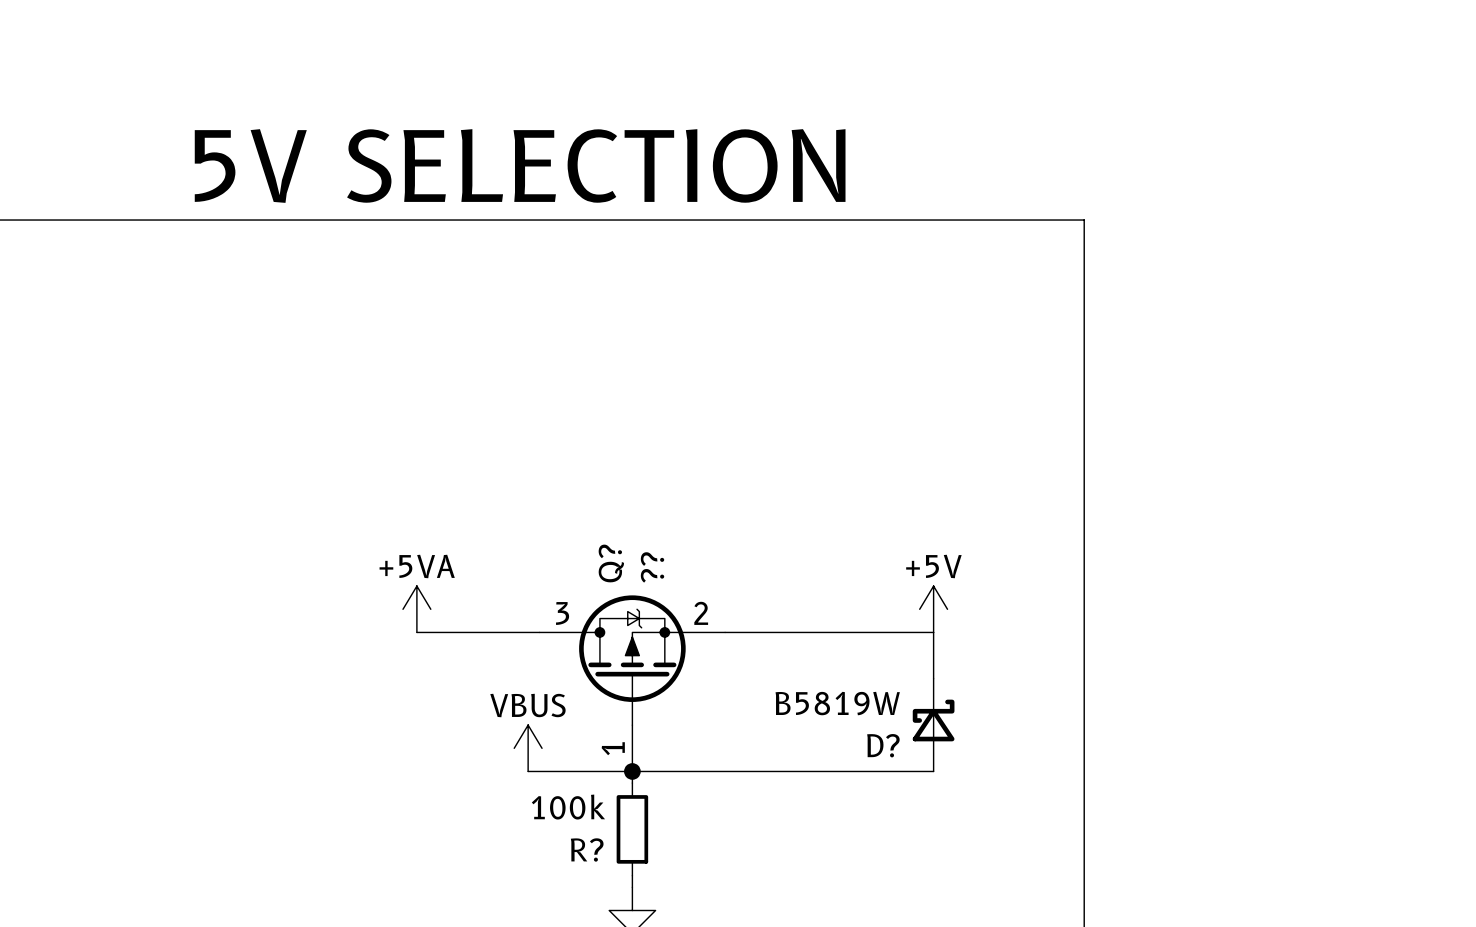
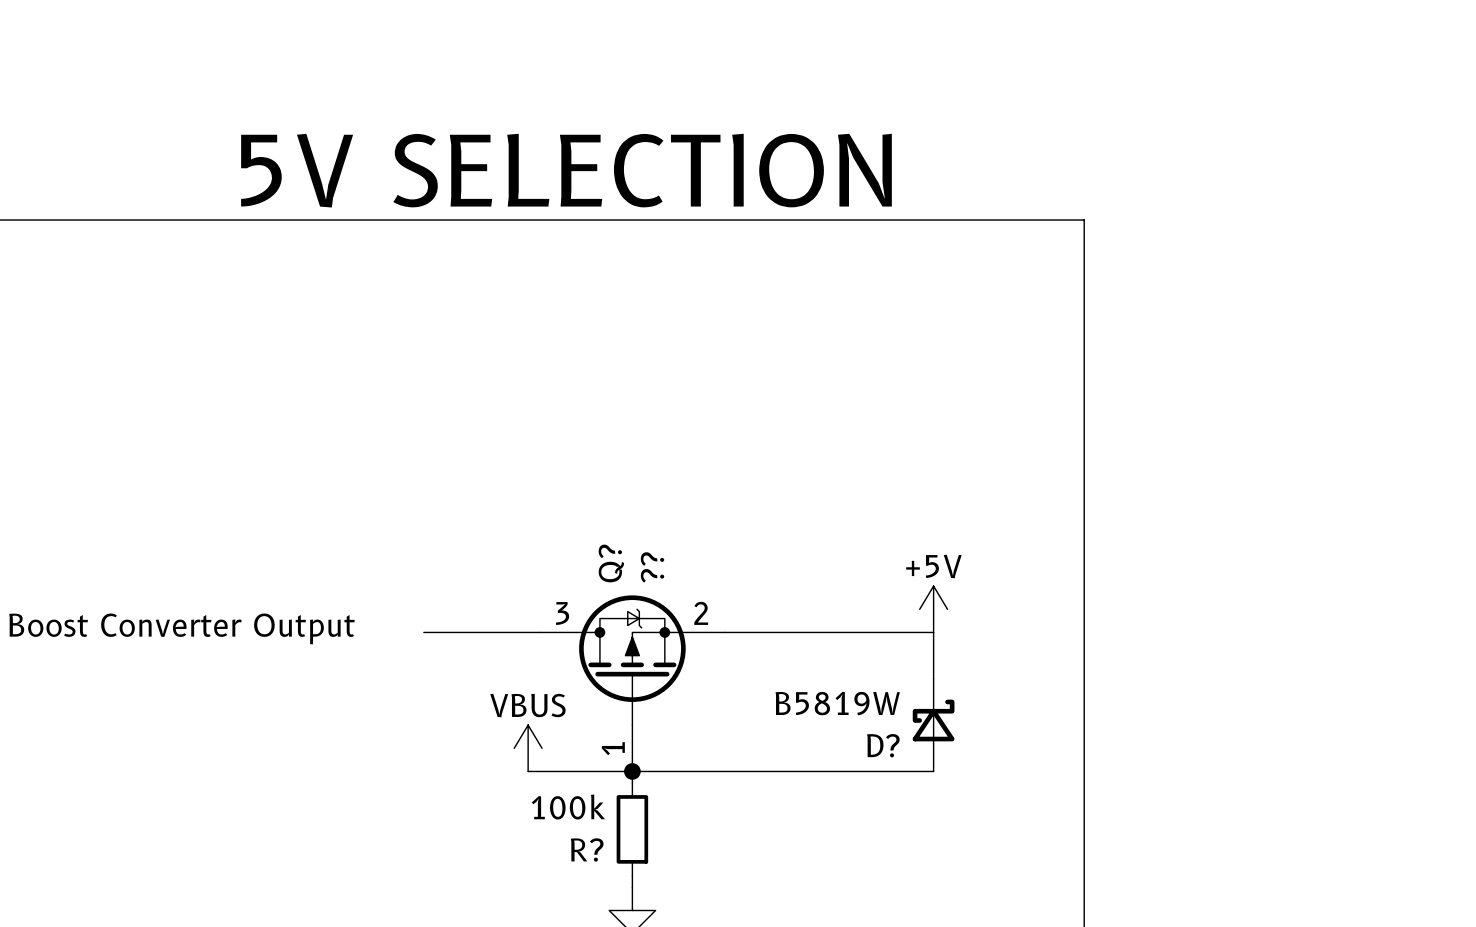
text position: 5V SELECTION (520, 166) -> 5V SELECTION (566, 170)
power symbol: +5VA (416, 609) -> none
text: none -> Boost Converter Output (181, 628)
wire: (416, 632) (423, 632) -> none

